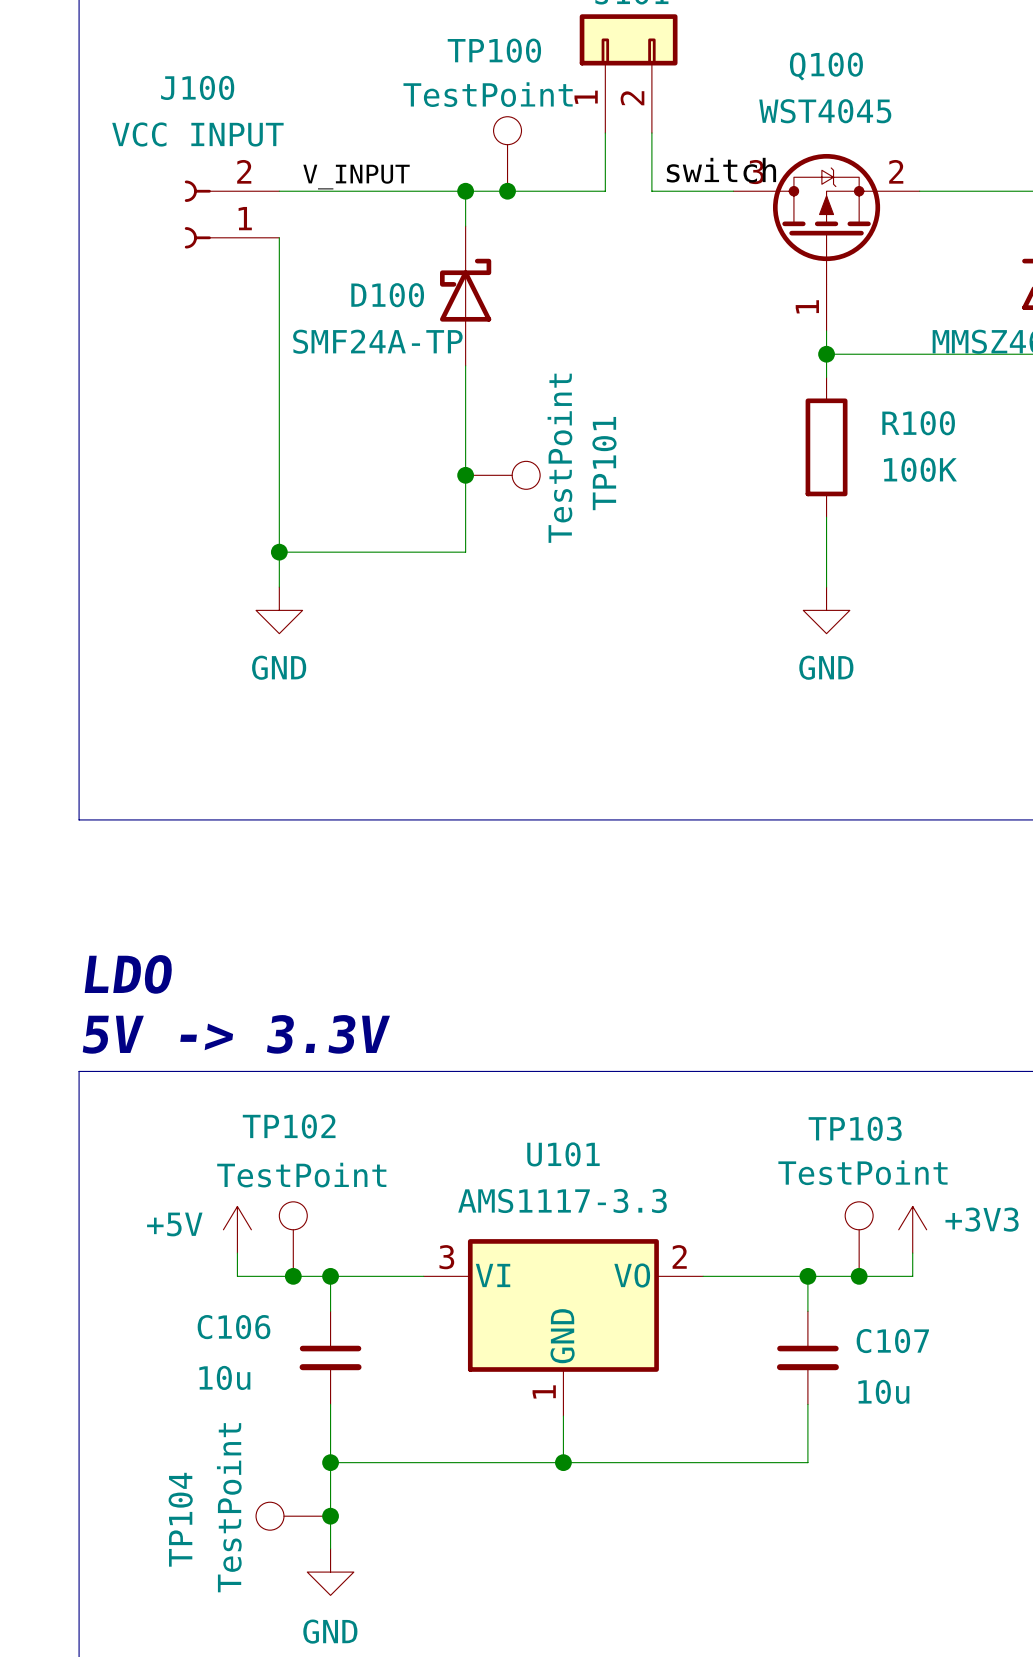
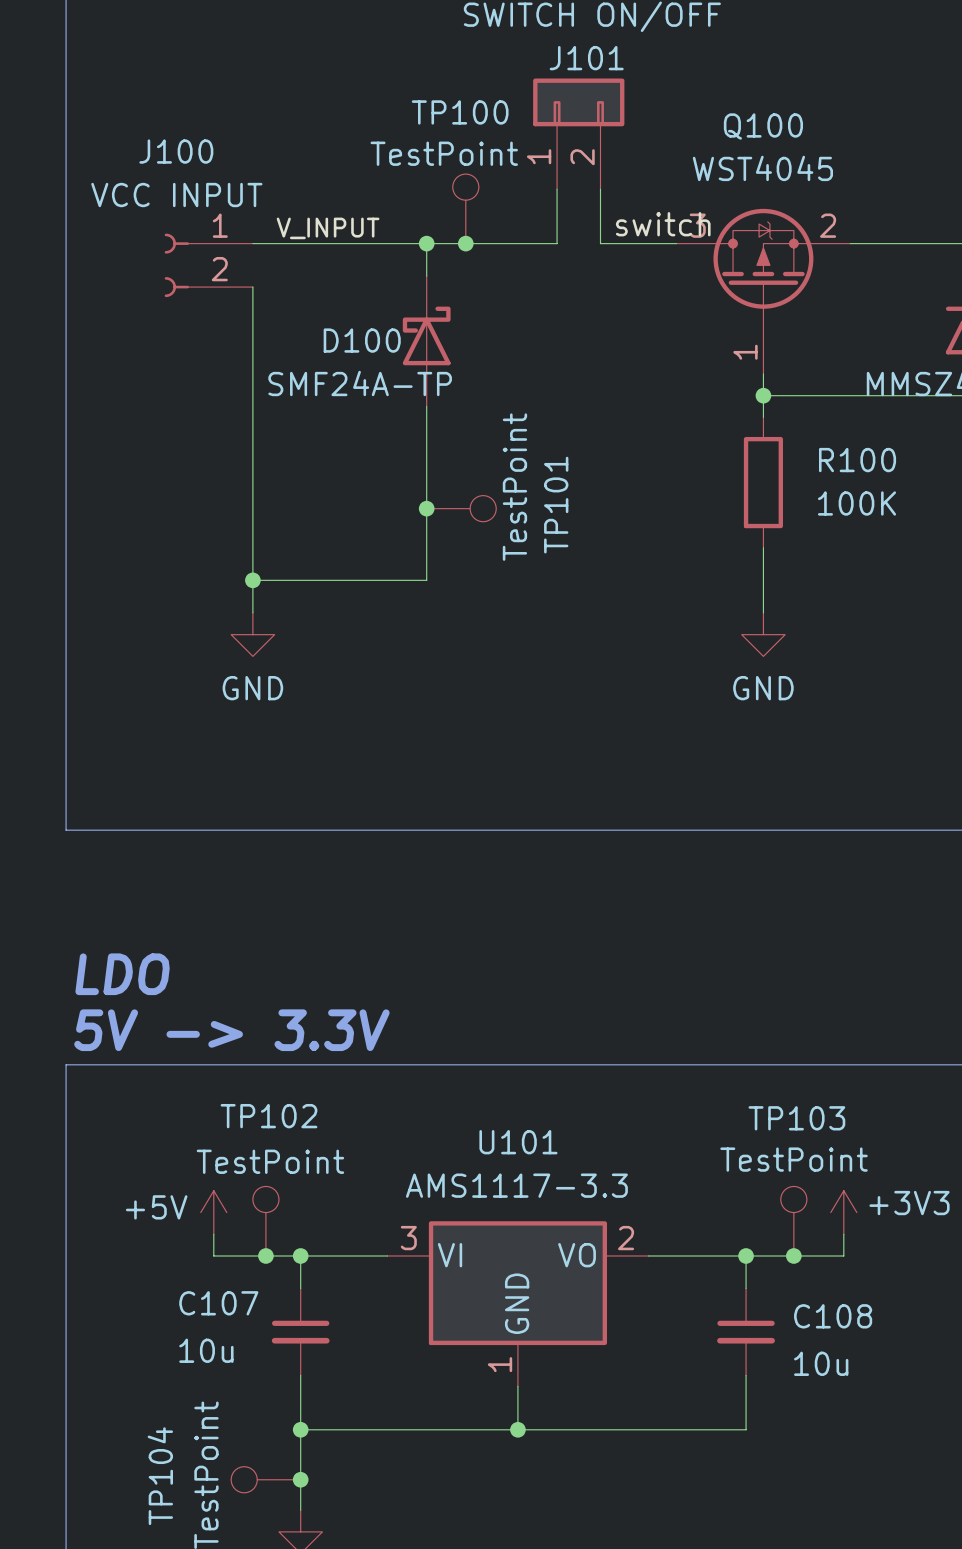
J100 flip: as is (197, 214) -> up-down (176, 265)
C106 name: C106 (234, 1327) -> C107 (218, 1303)
C107 name: C107 (892, 1341) -> C108 (833, 1316)

